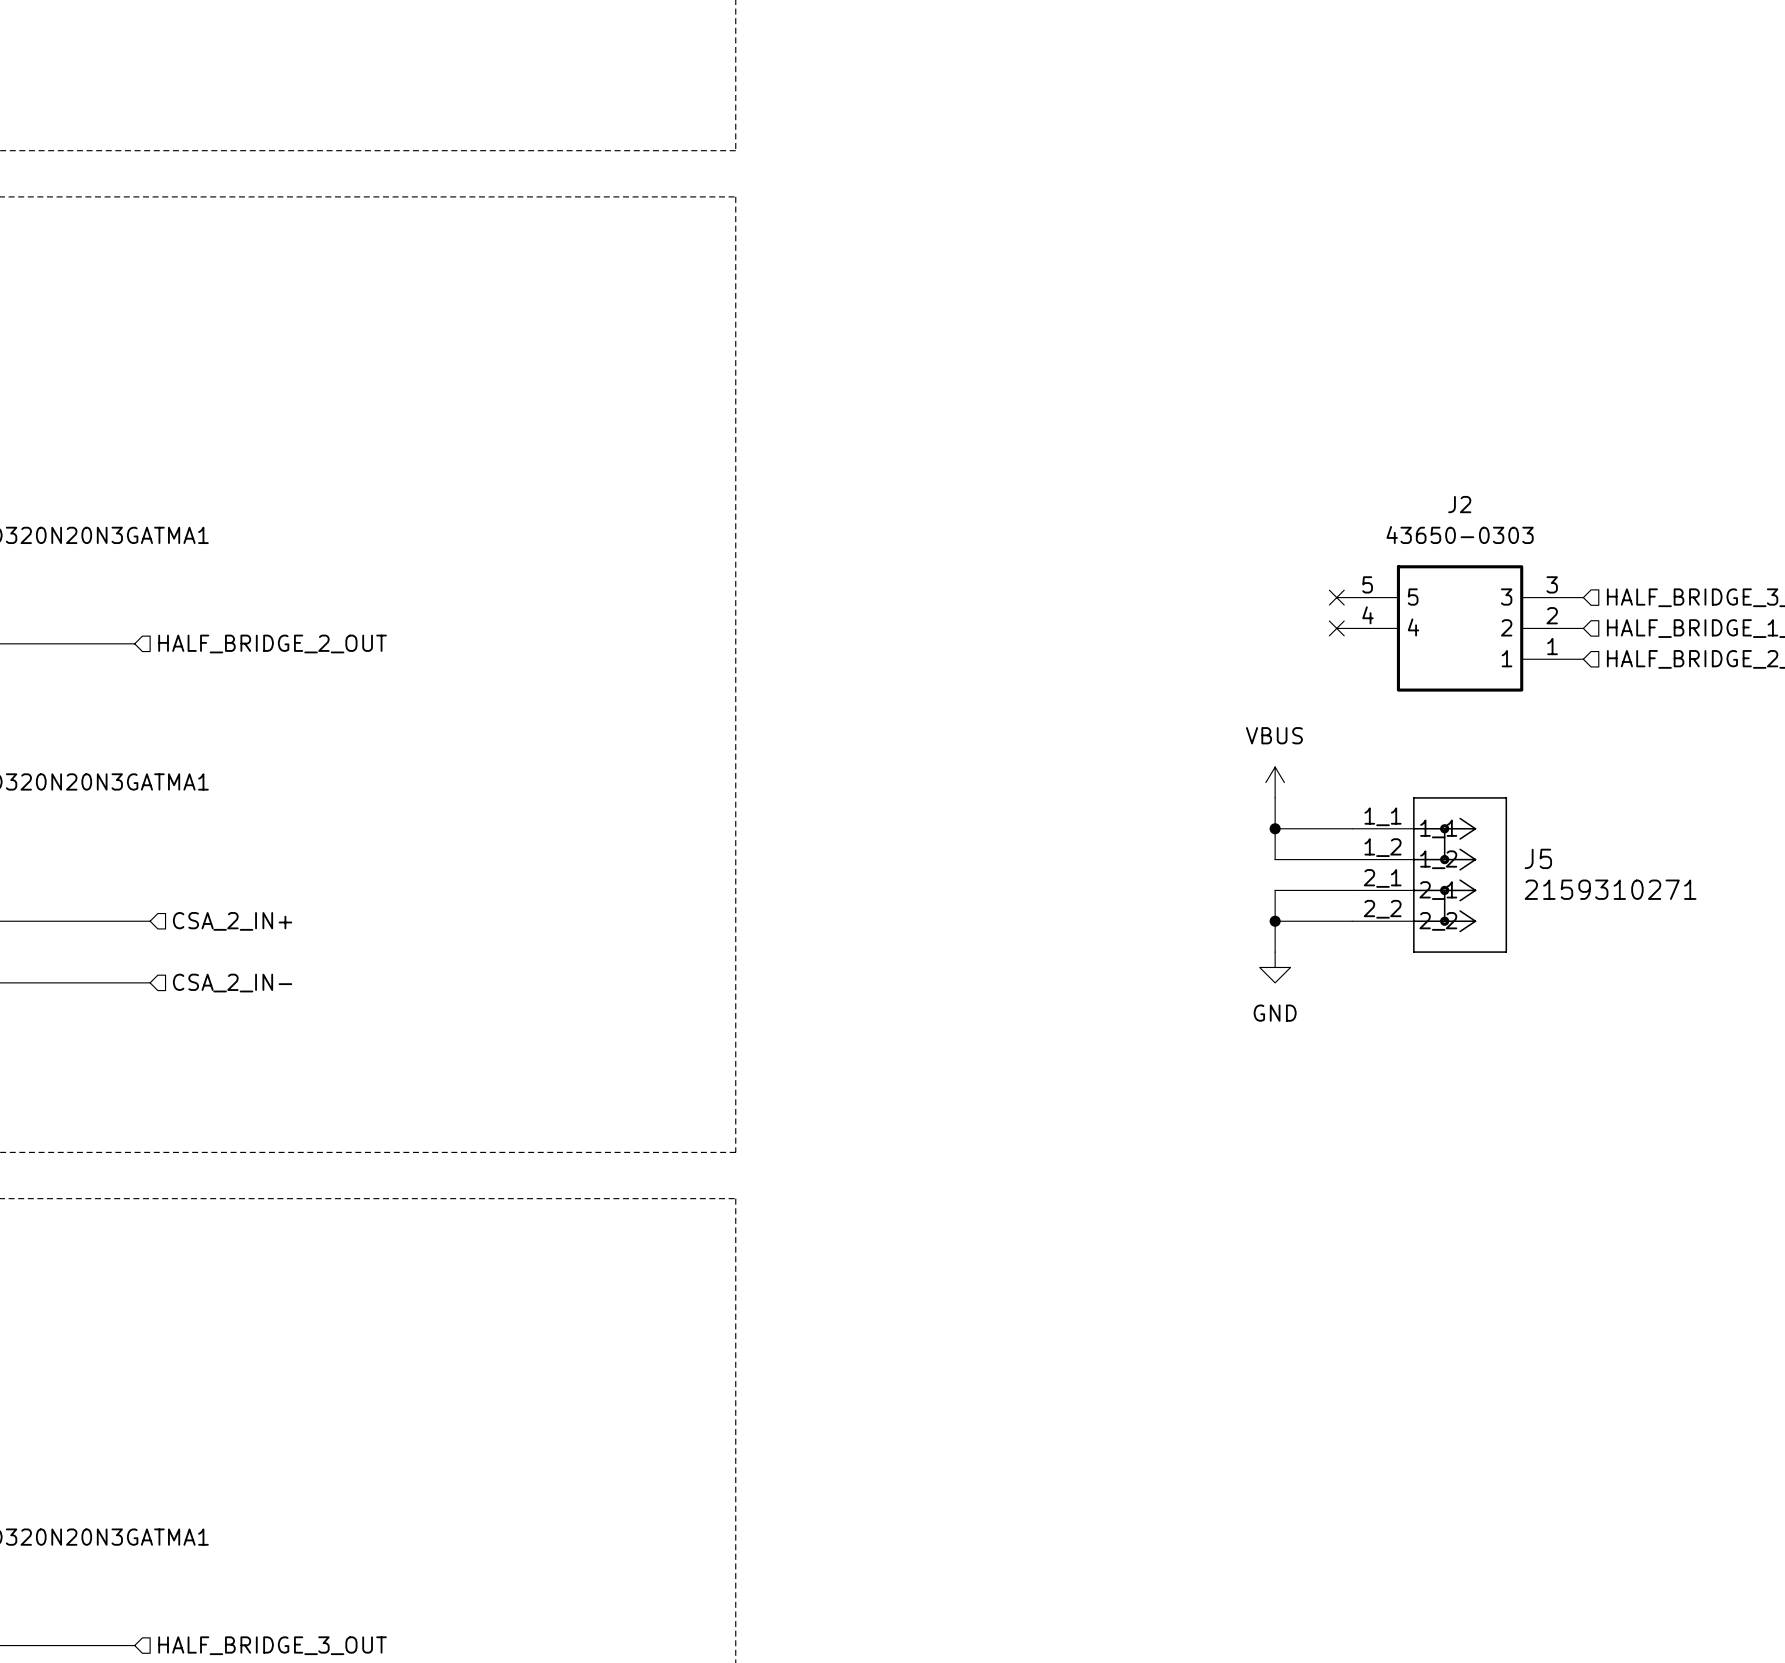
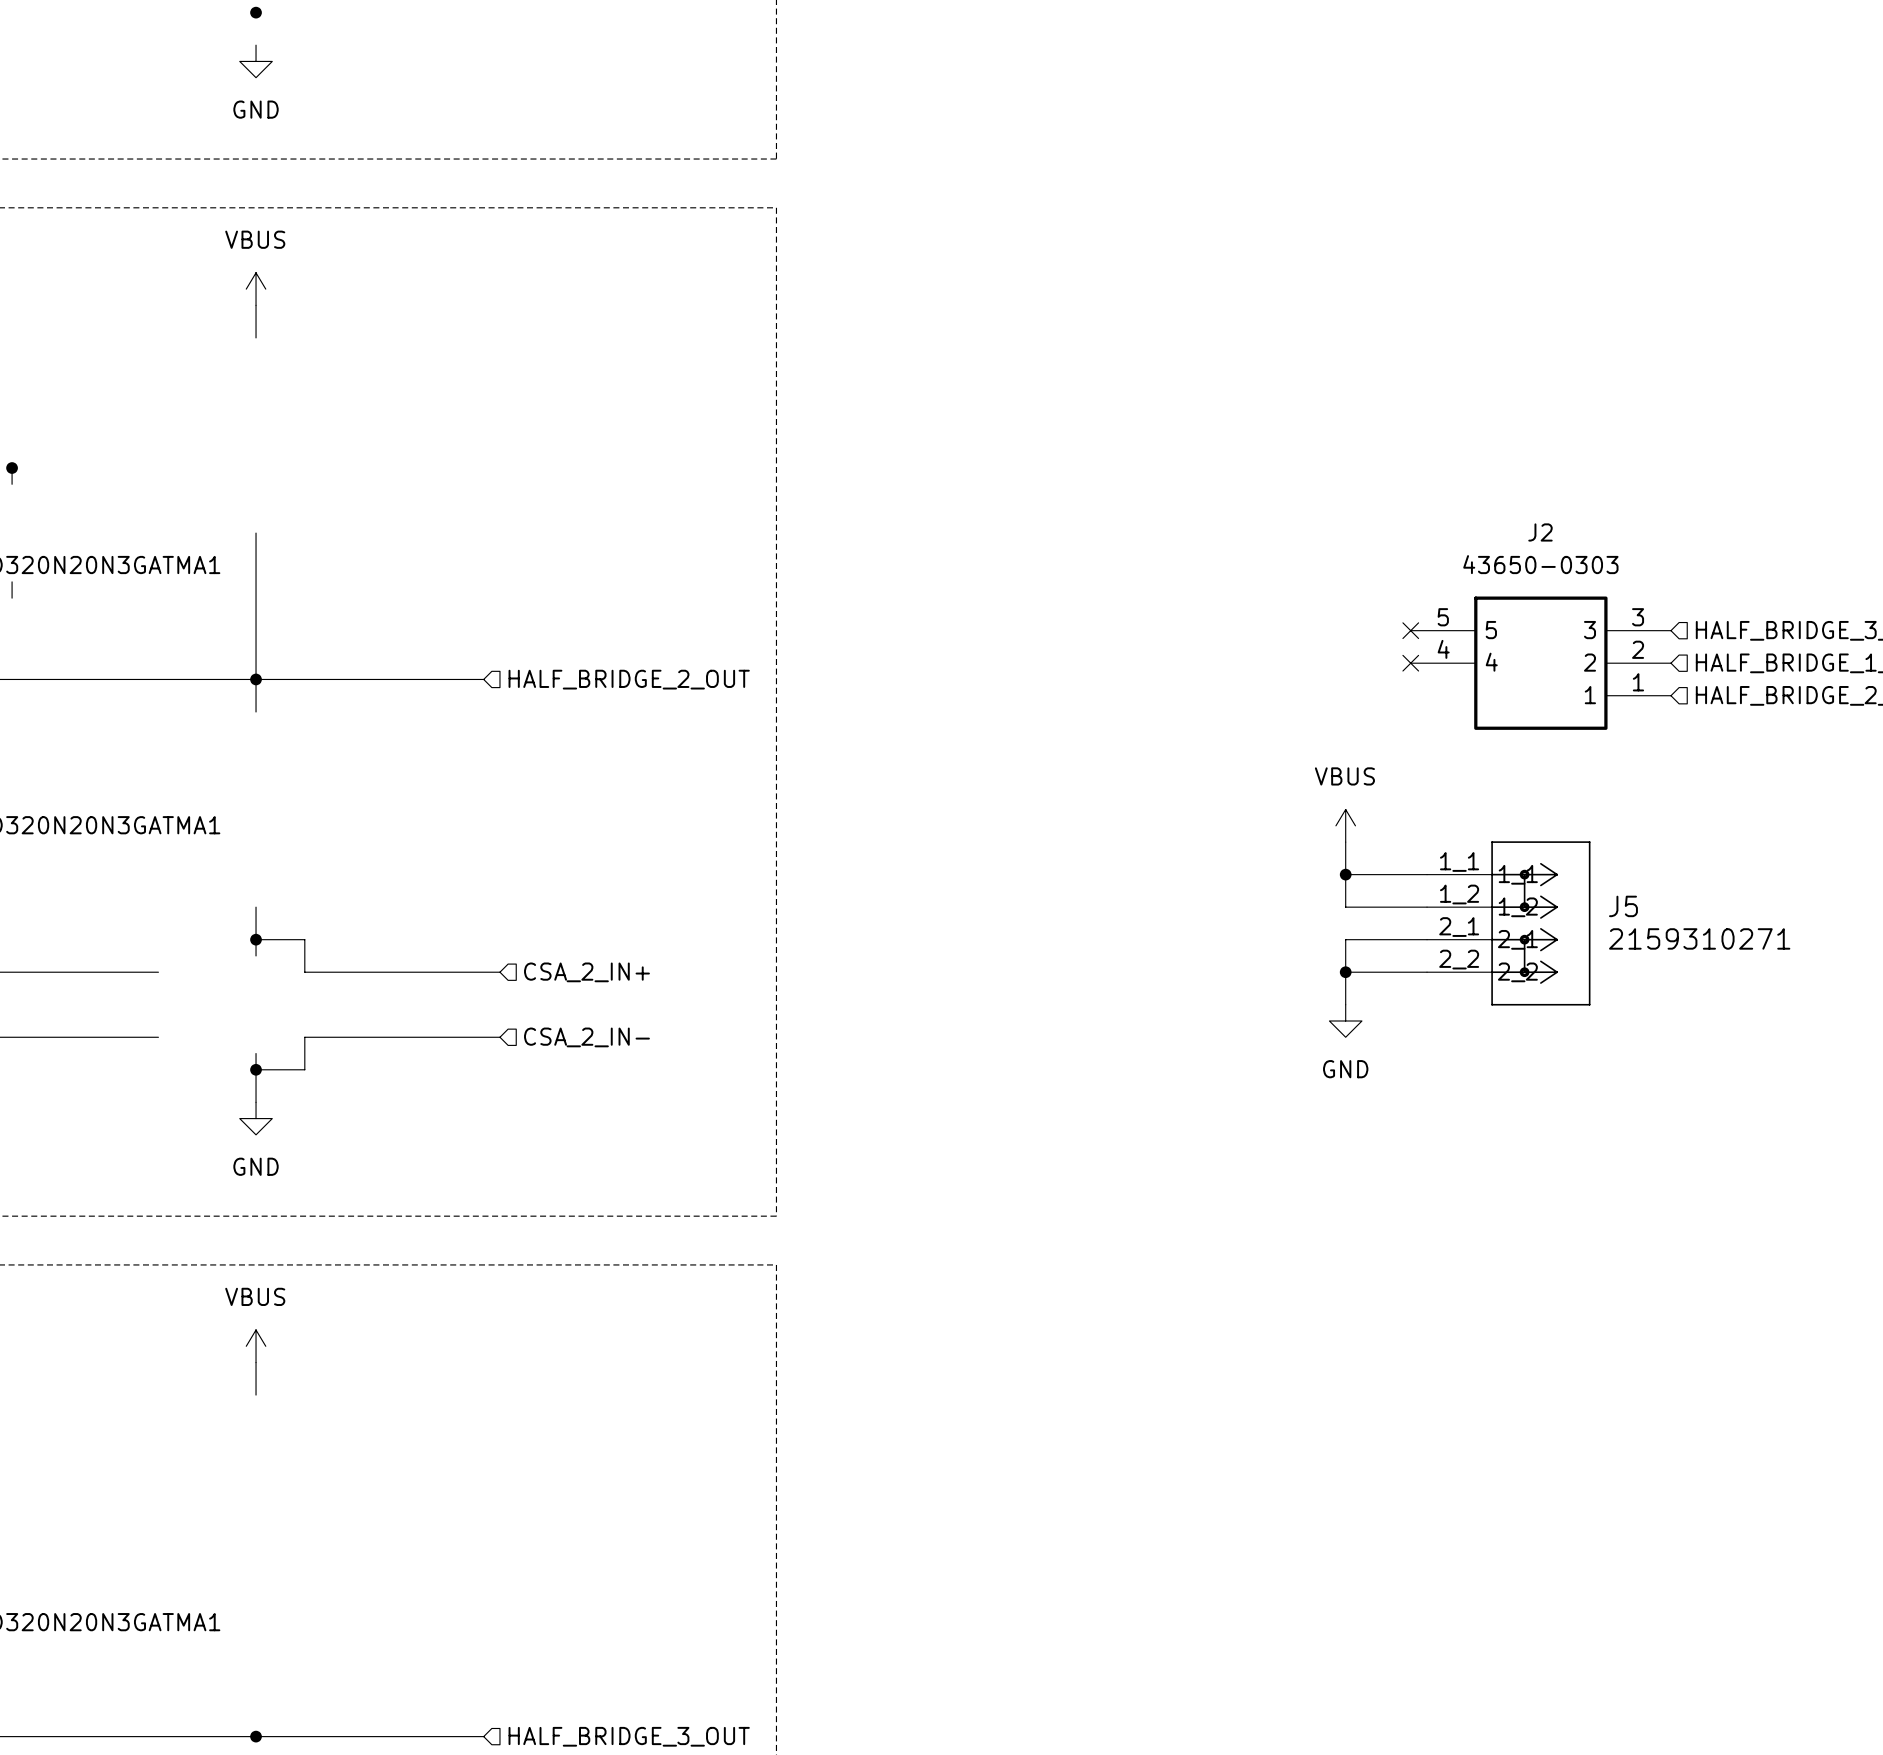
junction: none -> (256, 12)
power symbol: none -> GND (256, 61)
power symbol: none -> VBUS (256, 289)
wire: none -> (256, 305) (256, 337)
wire: none -> (12, 468) (12, 484)
junction: none -> (12, 468)
wire: none -> (256, 533) (256, 711)
wire: none -> (12, 581) (12, 598)
wire: none -> (142, 679) (483, 679)
junction: none -> (256, 679)
hierarchical label: HALF_BRIDGE_2_OUT (272, 643) -> none
hierarchical label: none -> HALF_BRIDGE_2_OUT (629, 679)
wire: none -> (256, 907) (256, 955)
wire: none -> (256, 939) (304, 939) (304, 972) (499, 972)
junction: none -> (256, 939)
hierarchical label: CSA_2_IN+ (232, 921) -> none
hierarchical label: none -> CSA_2_IN+ (586, 972)
wire: none -> (499, 1037) (304, 1037) (304, 1069) (256, 1069)
hierarchical label: CSA_2_IN- (232, 983) -> none
hierarchical label: none -> CSA_2_IN- (586, 1037)
wire: none -> (256, 1053) (256, 1102)
junction: none -> (256, 1069)
power symbol: none -> GND (256, 1118)
power symbol: none -> VBUS (256, 1346)
wire: none -> (256, 1362) (256, 1395)
wire: none -> (142, 1736) (483, 1736)
junction: none -> (256, 1736)
hierarchical label: HALF_BRIDGE_3_OUT (272, 1645) -> none
hierarchical label: none -> HALF_BRIDGE_3_OUT (629, 1736)

